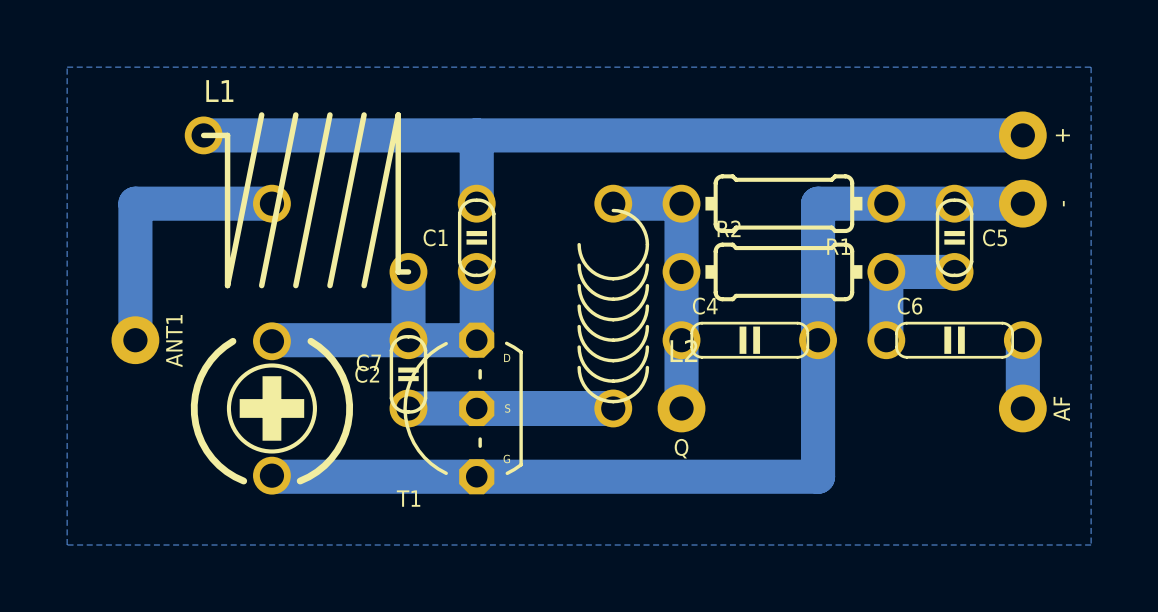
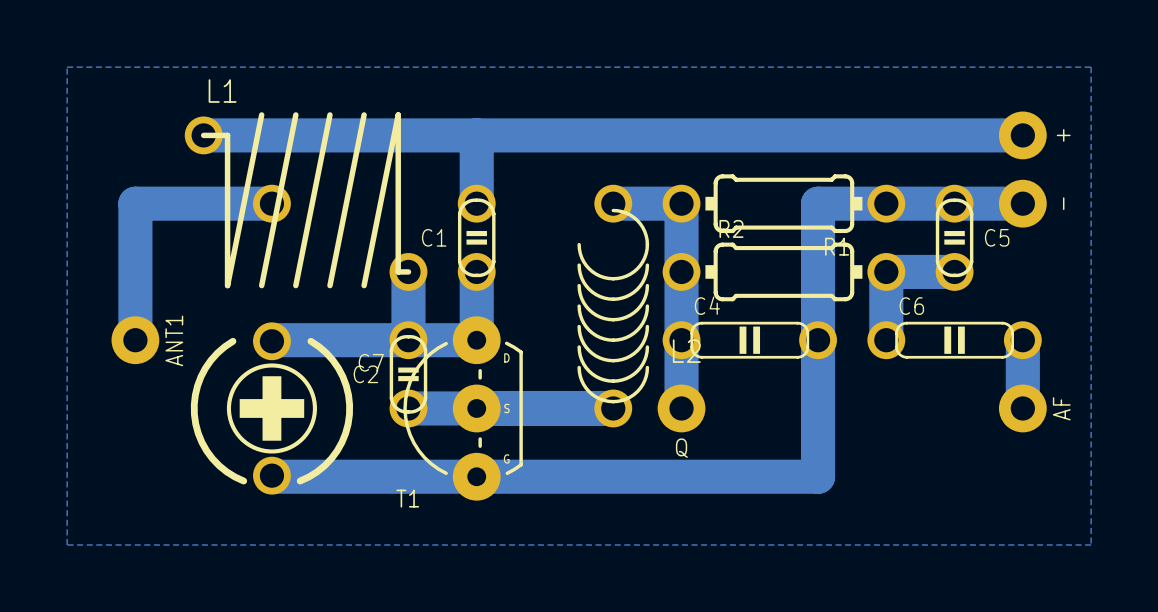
T1 footprint: [403, 322, 523, 495] -> [403, 316, 523, 501]

